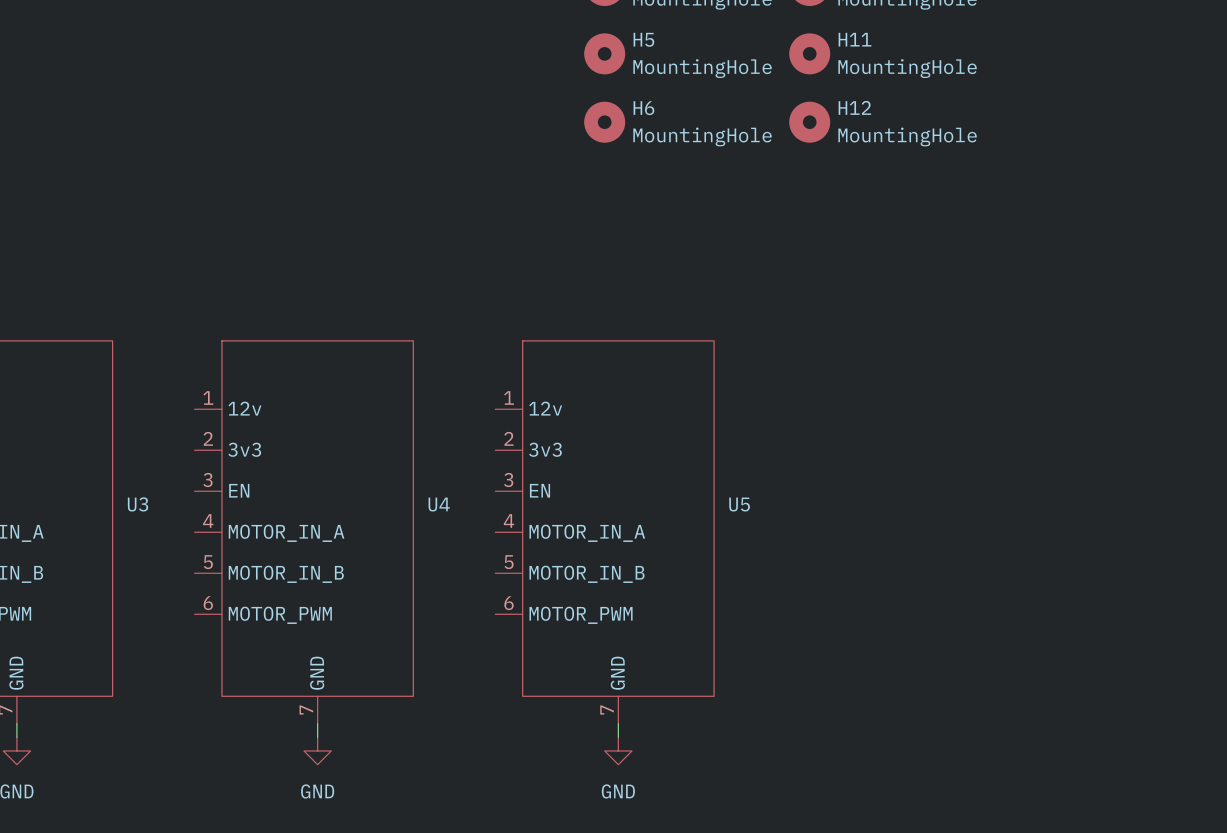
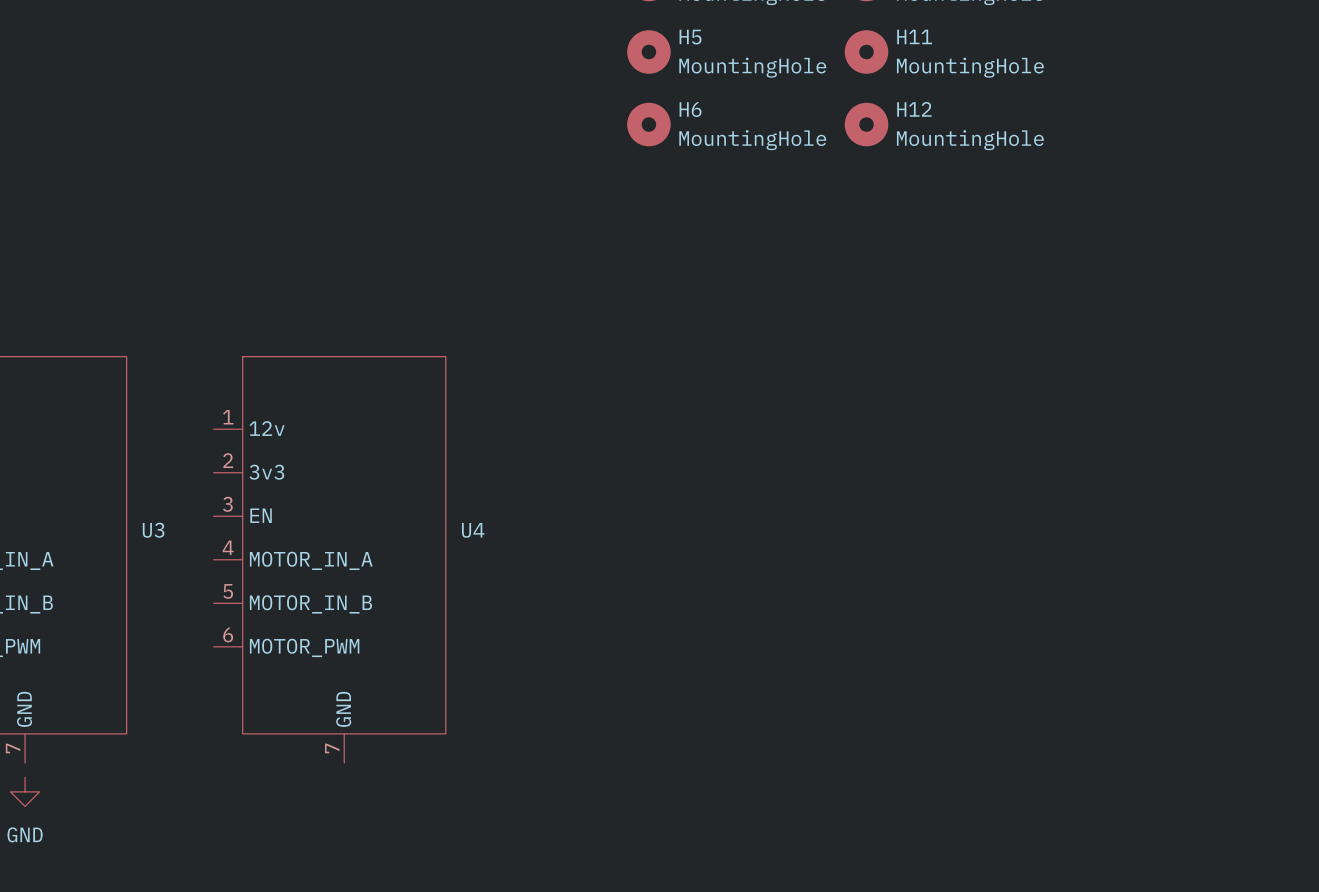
U5: (604, 532) -> none
wire: (16, 723) (16, 737) -> none
wire: (317, 723) (317, 737) -> none
wire: (618, 723) (618, 737) -> none
power symbol: GND (317, 750) -> none
power symbol: GND (618, 750) -> none

